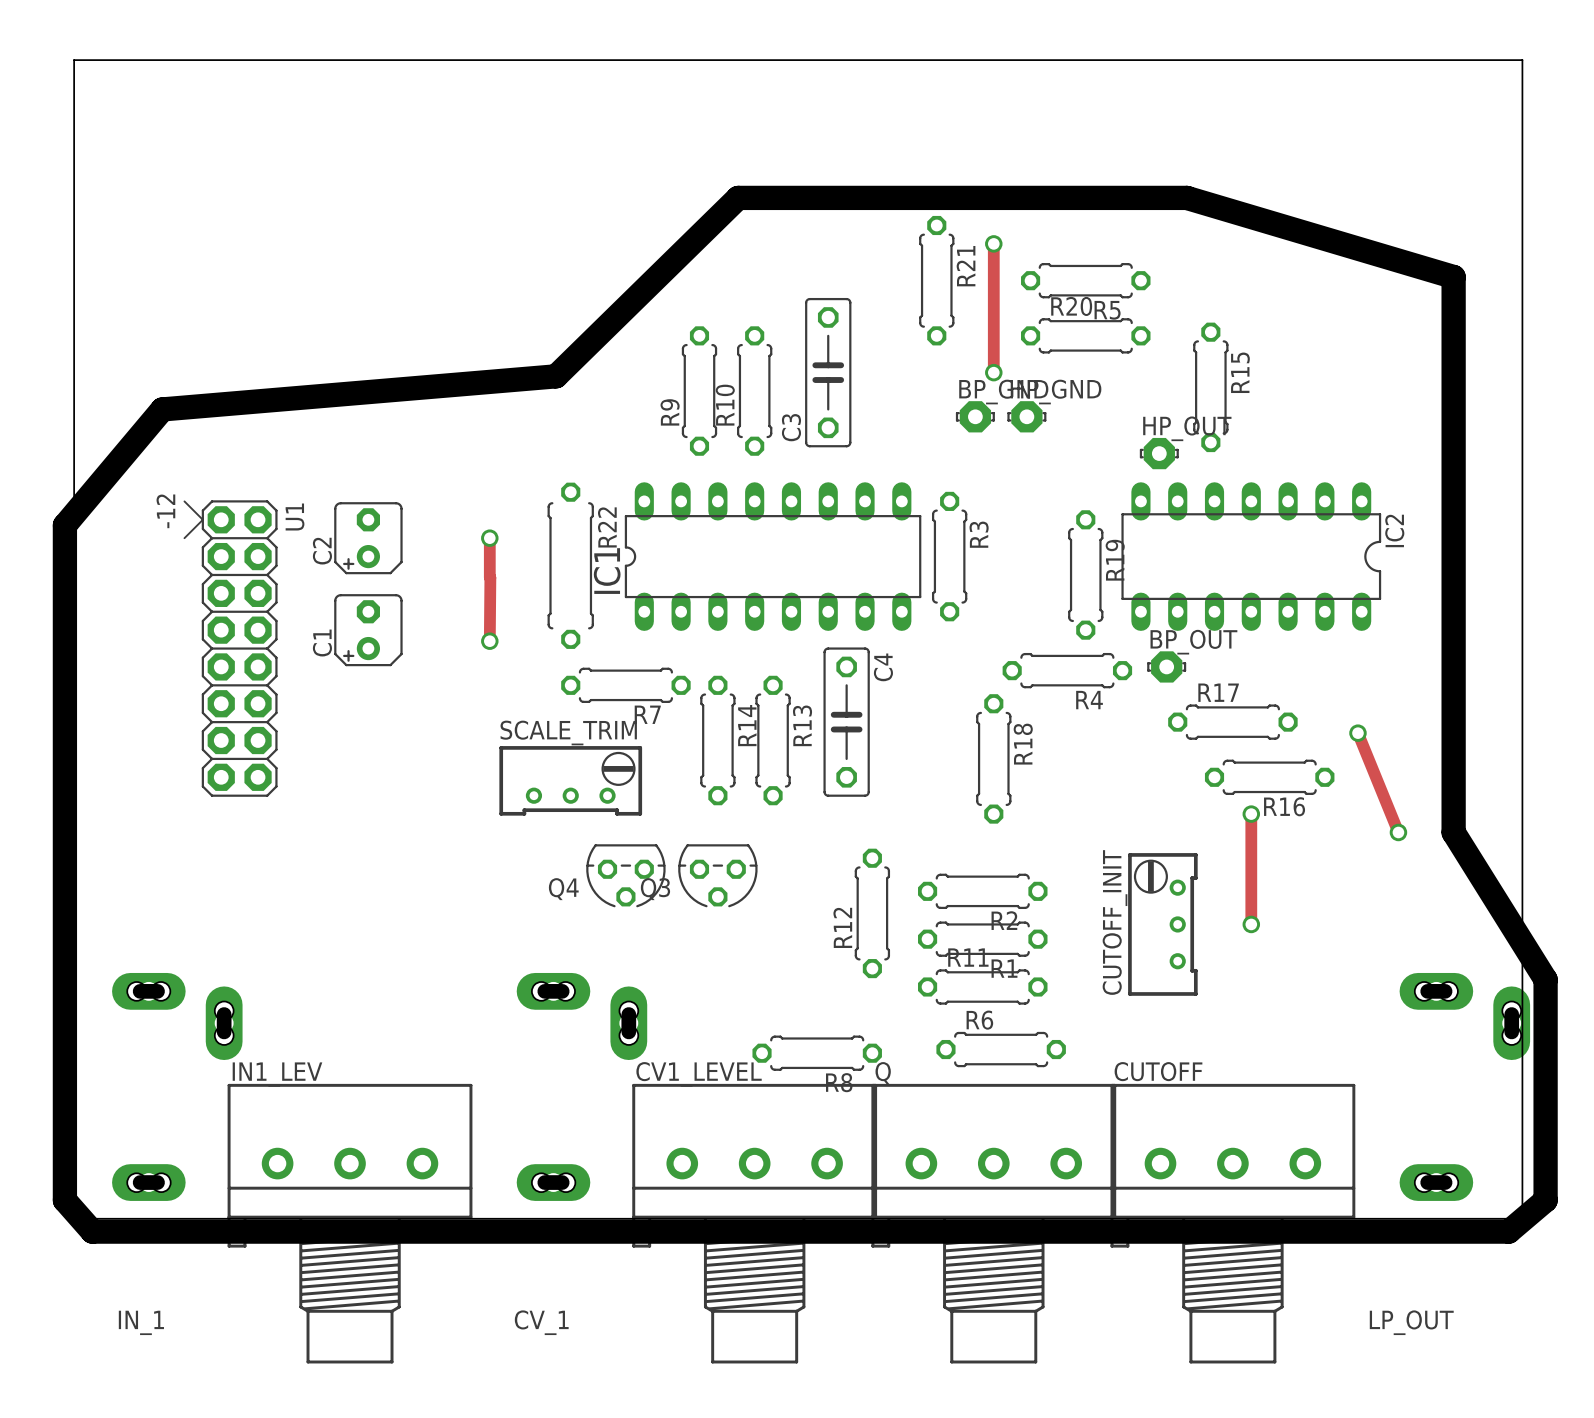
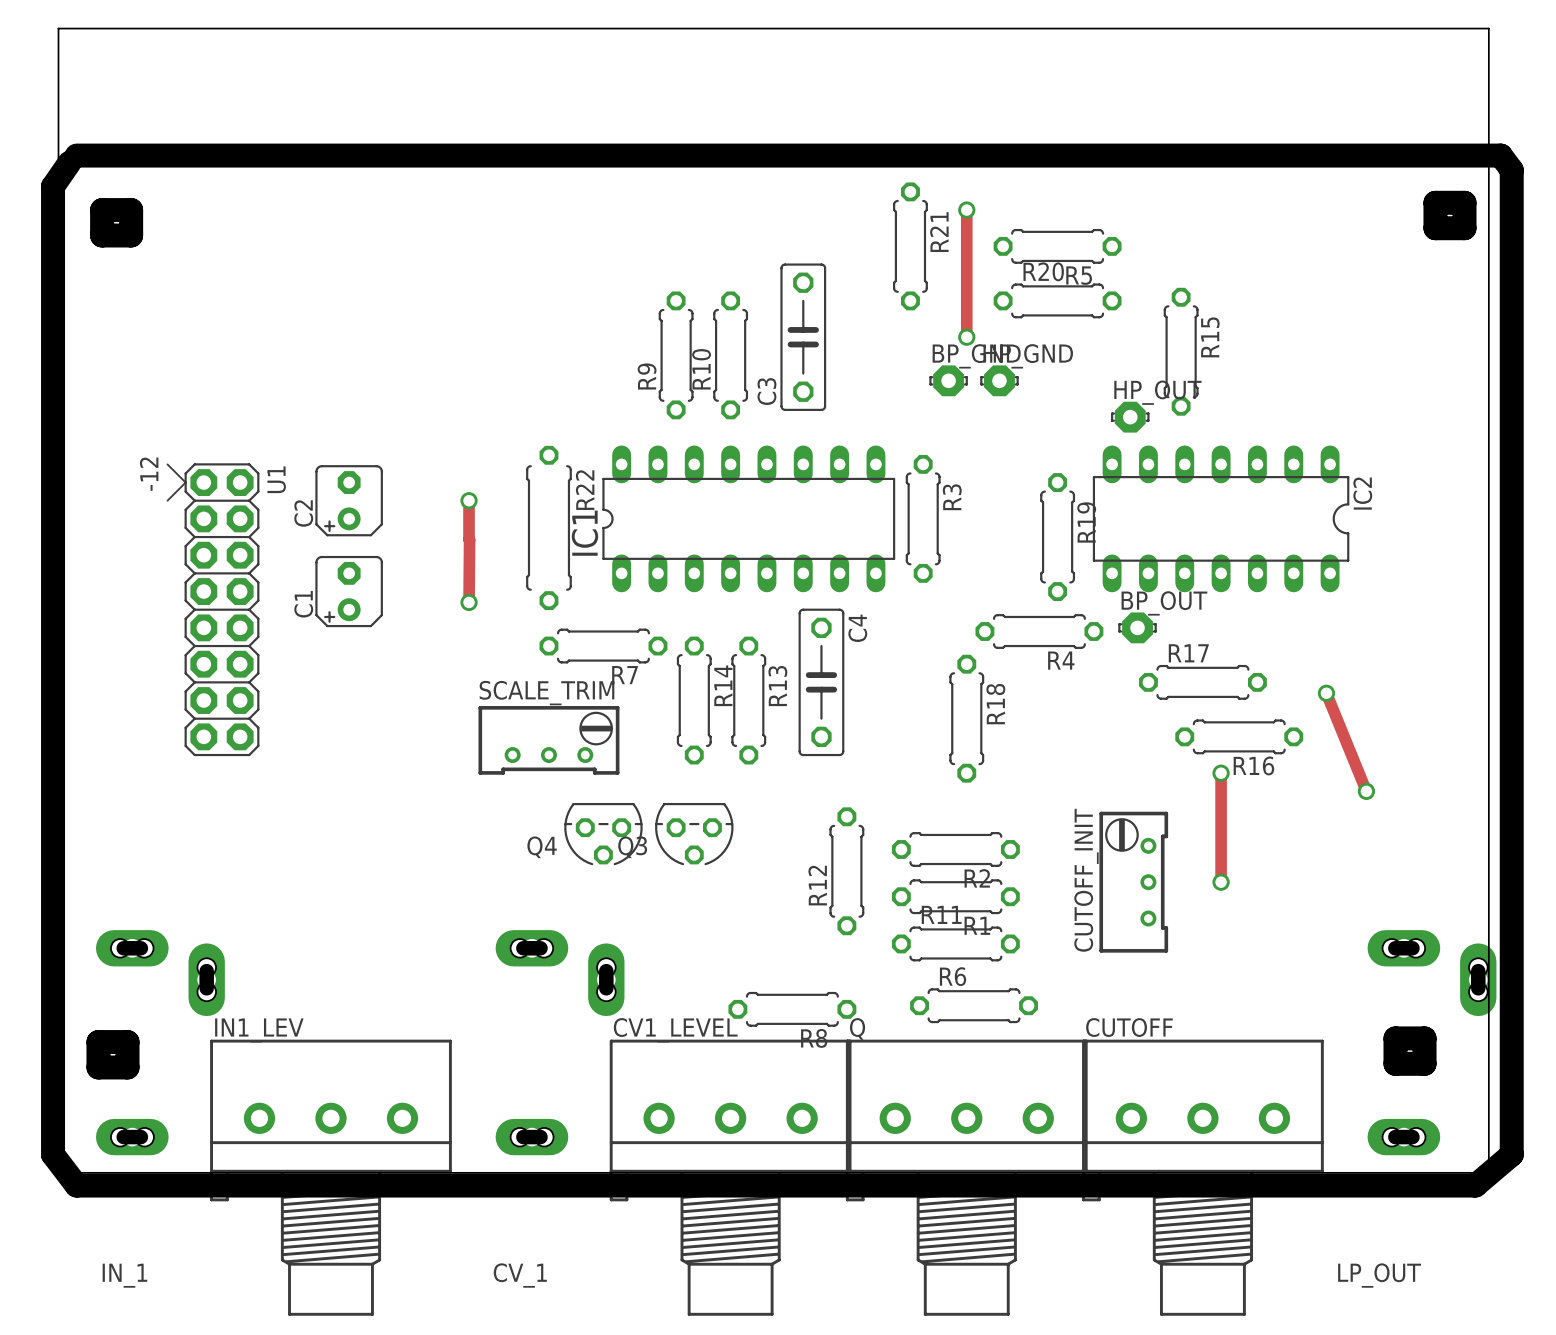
board edge: none -> (69, 162) (53, 186) (53, 1154) (76, 1185)
board edge: none -> (1435, 202) (1464, 202) (1464, 228) (1435, 228) (1435, 202)
board edge: none -> (102, 210) (131, 210) (131, 235) (102, 235) (102, 210)
board edge: (1545, 979) (1453, 832) (1453, 277) (1186, 197) (738, 197) (556, 376) (162, 409) (64, 525) (64, 1200) (92, 1231) -> (1511, 936) (1511, 170) (1500, 155) (76, 155)
board edge: none -> (1395, 1038) (1424, 1038) (1424, 1063) (1395, 1063) (1395, 1038)
board edge: none -> (98, 1042) (127, 1042) (127, 1067) (98, 1067) (98, 1042)

